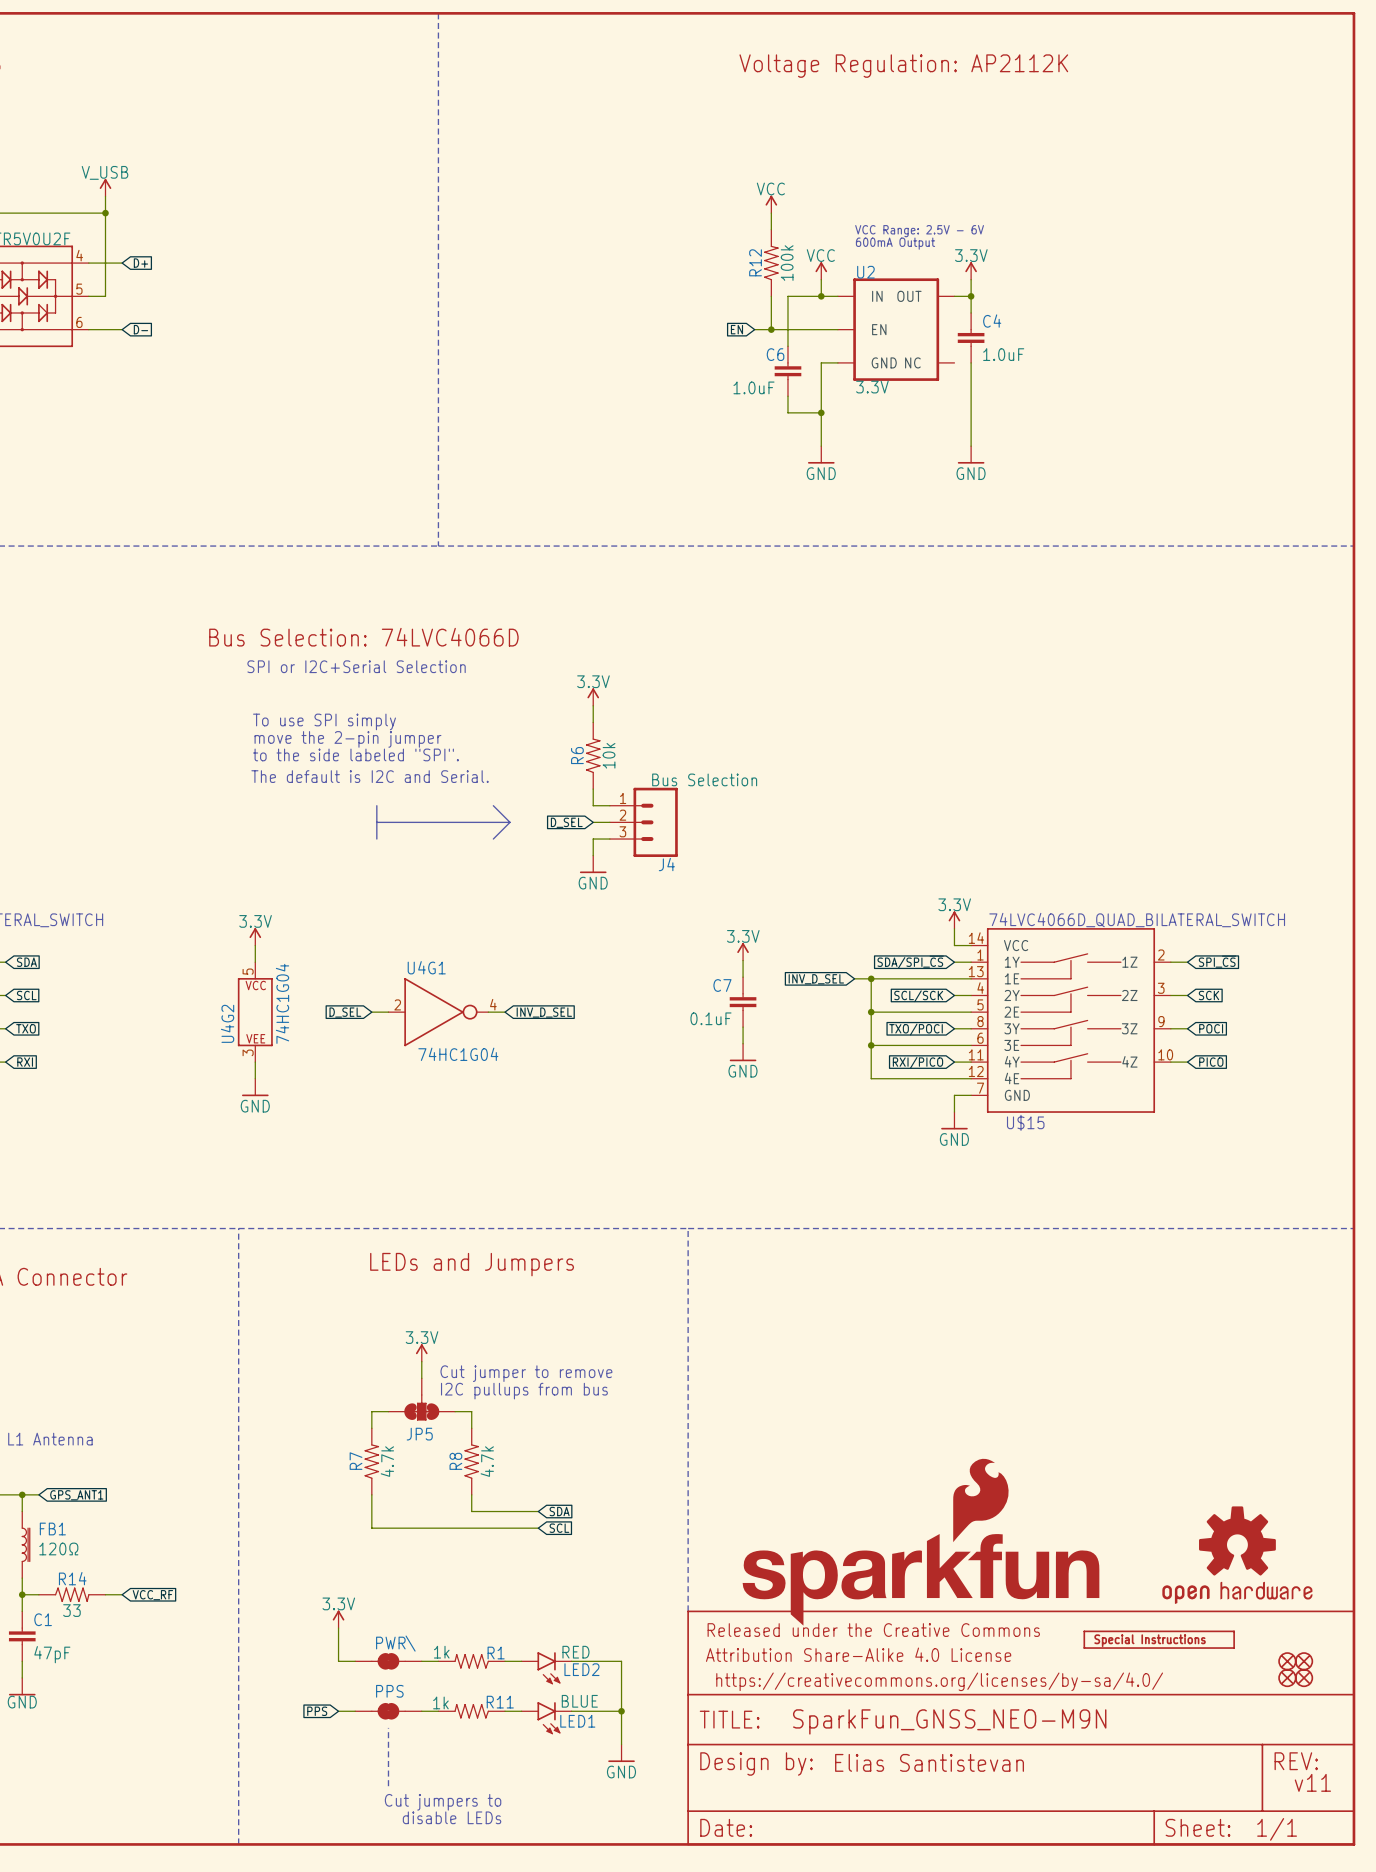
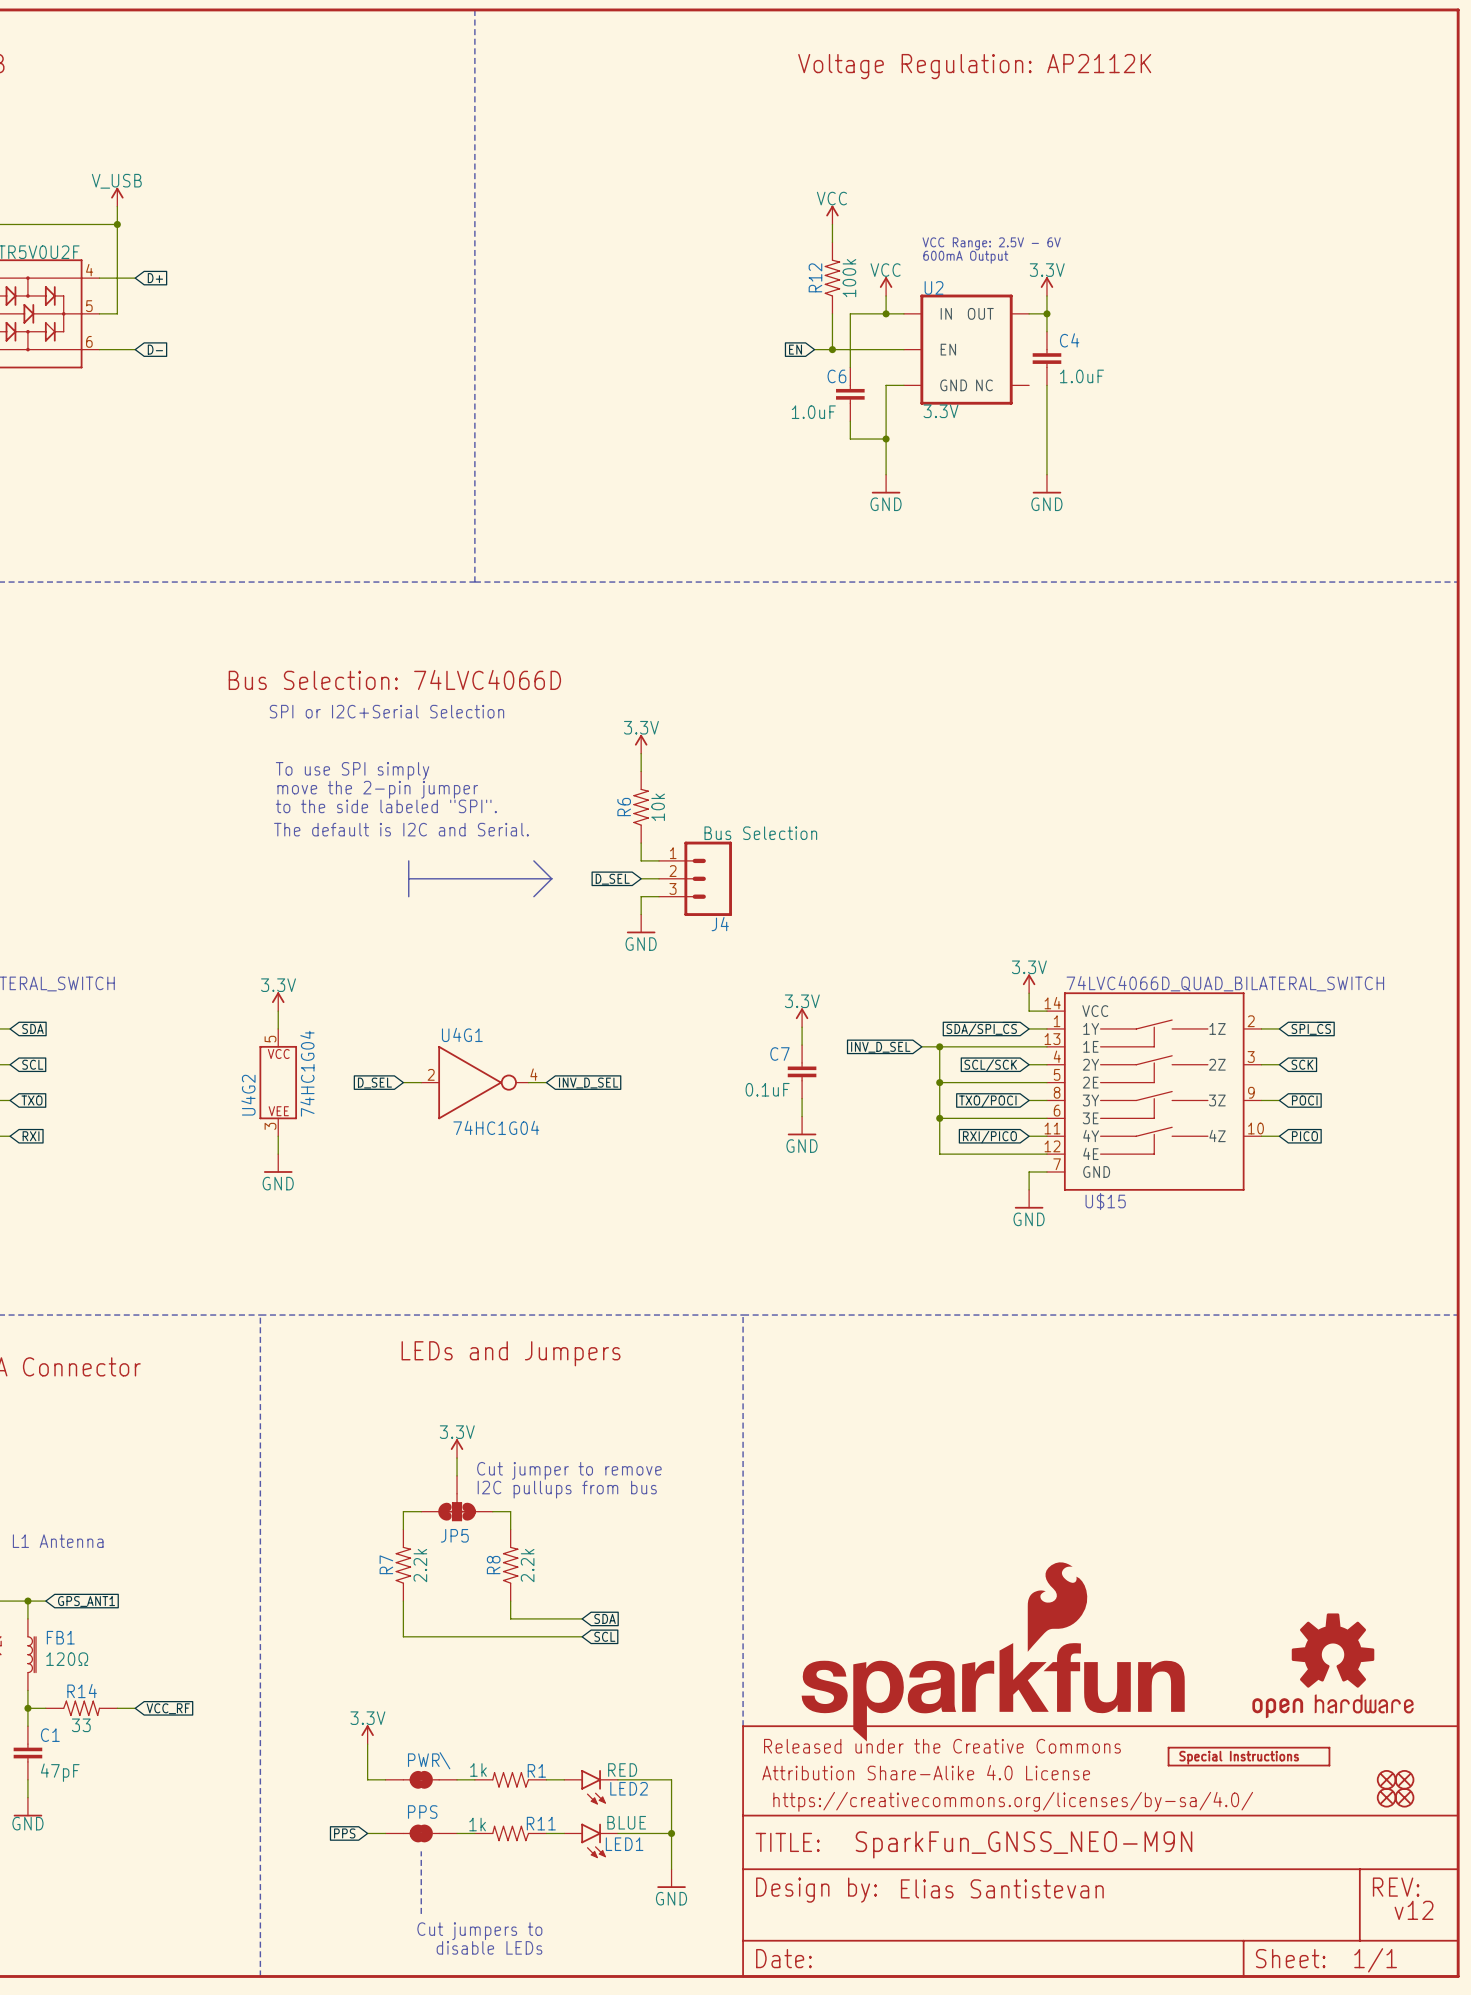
R7 value: 4.7k (387, 1461) -> 2.2k (420, 1565)
R8 value: 4.7k (487, 1461) -> 2.2k (527, 1565)
text: v11 (1312, 1782) -> v12 (1414, 1910)

